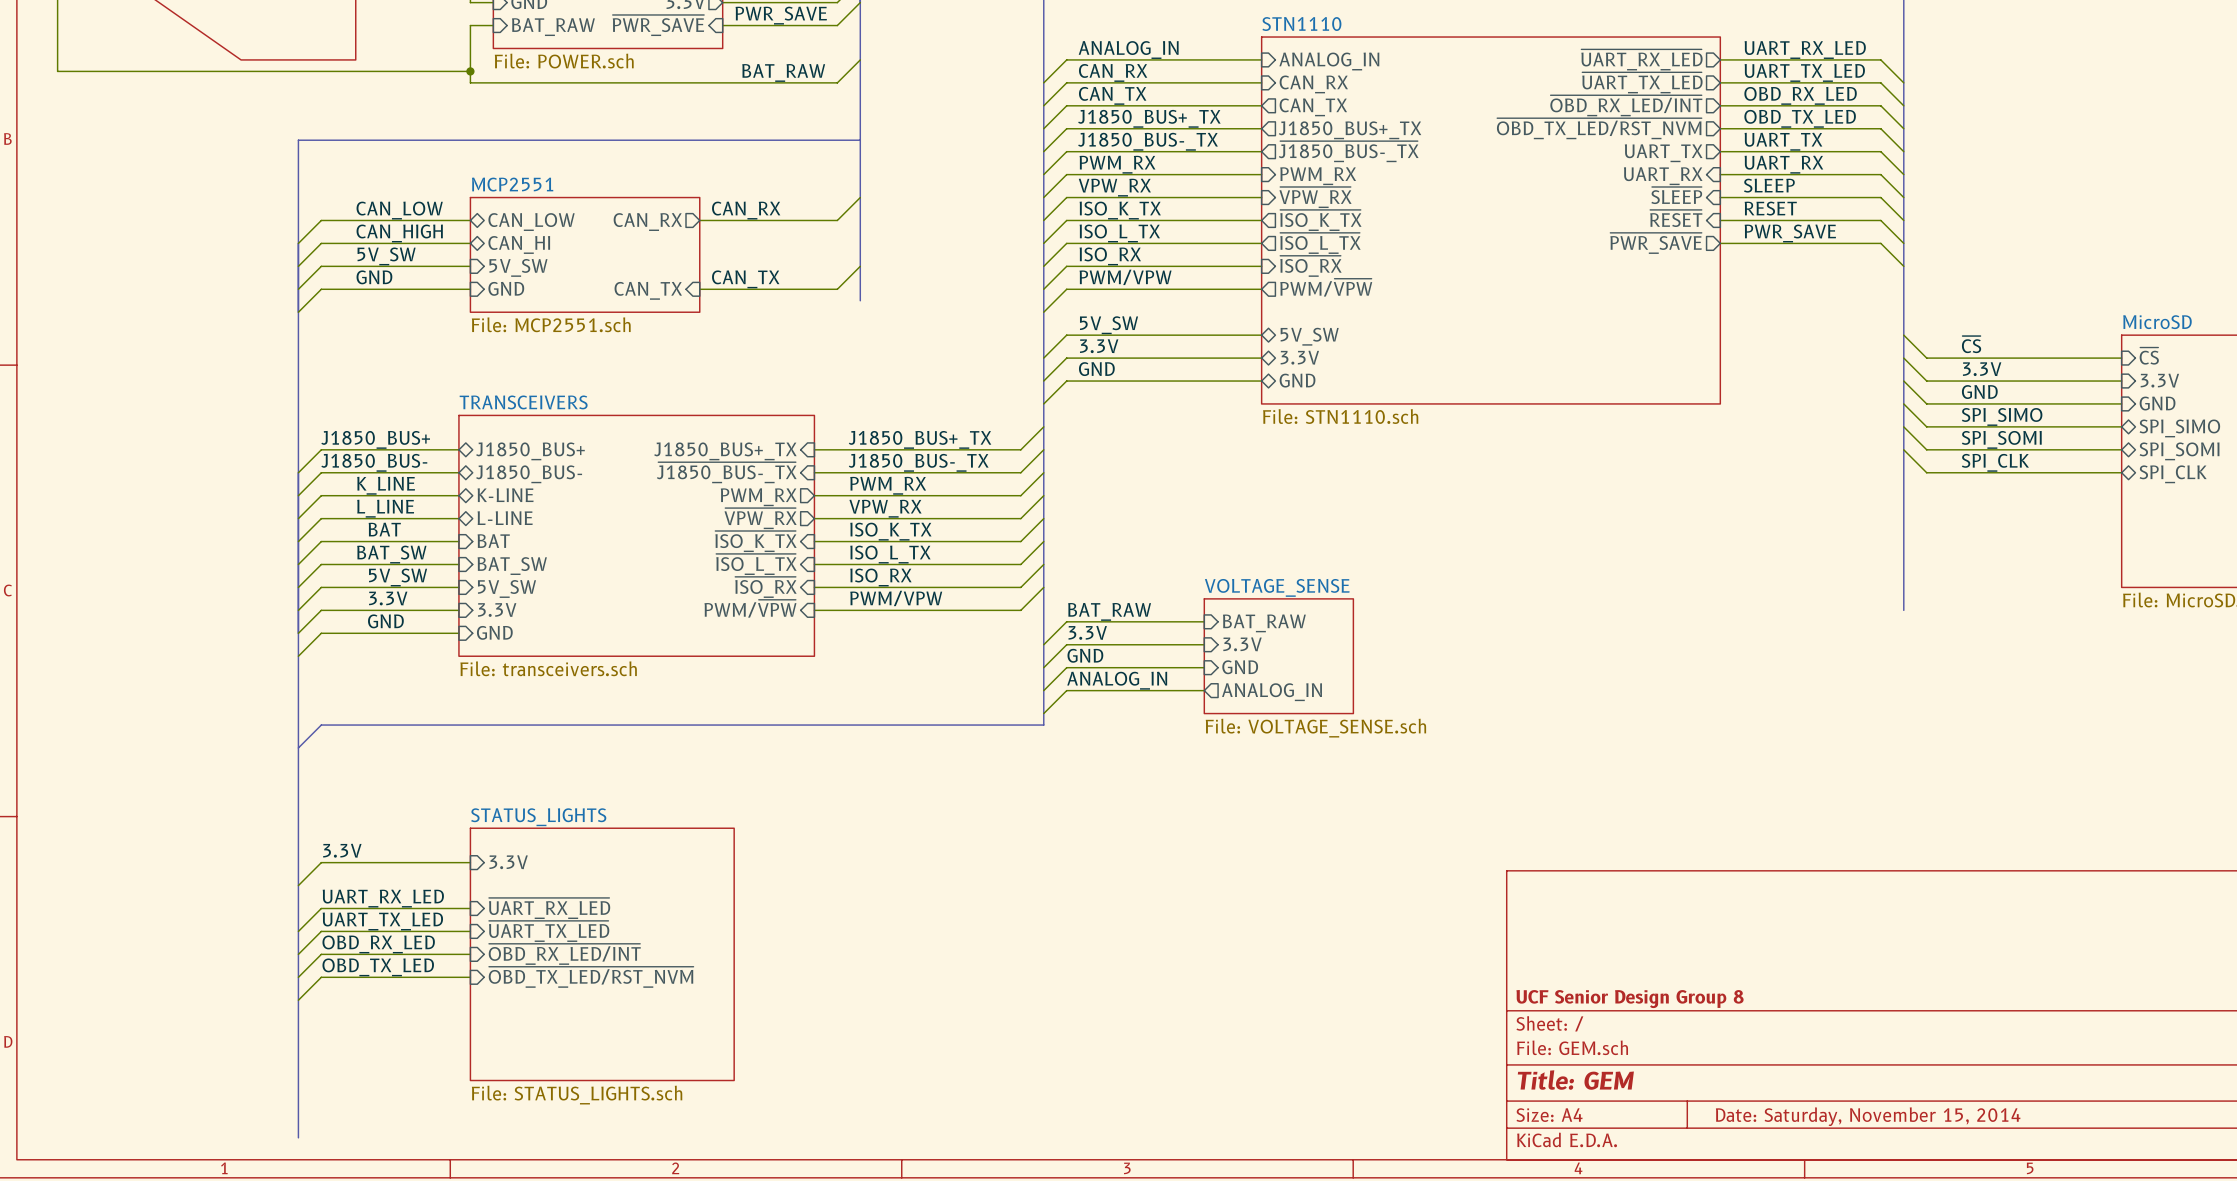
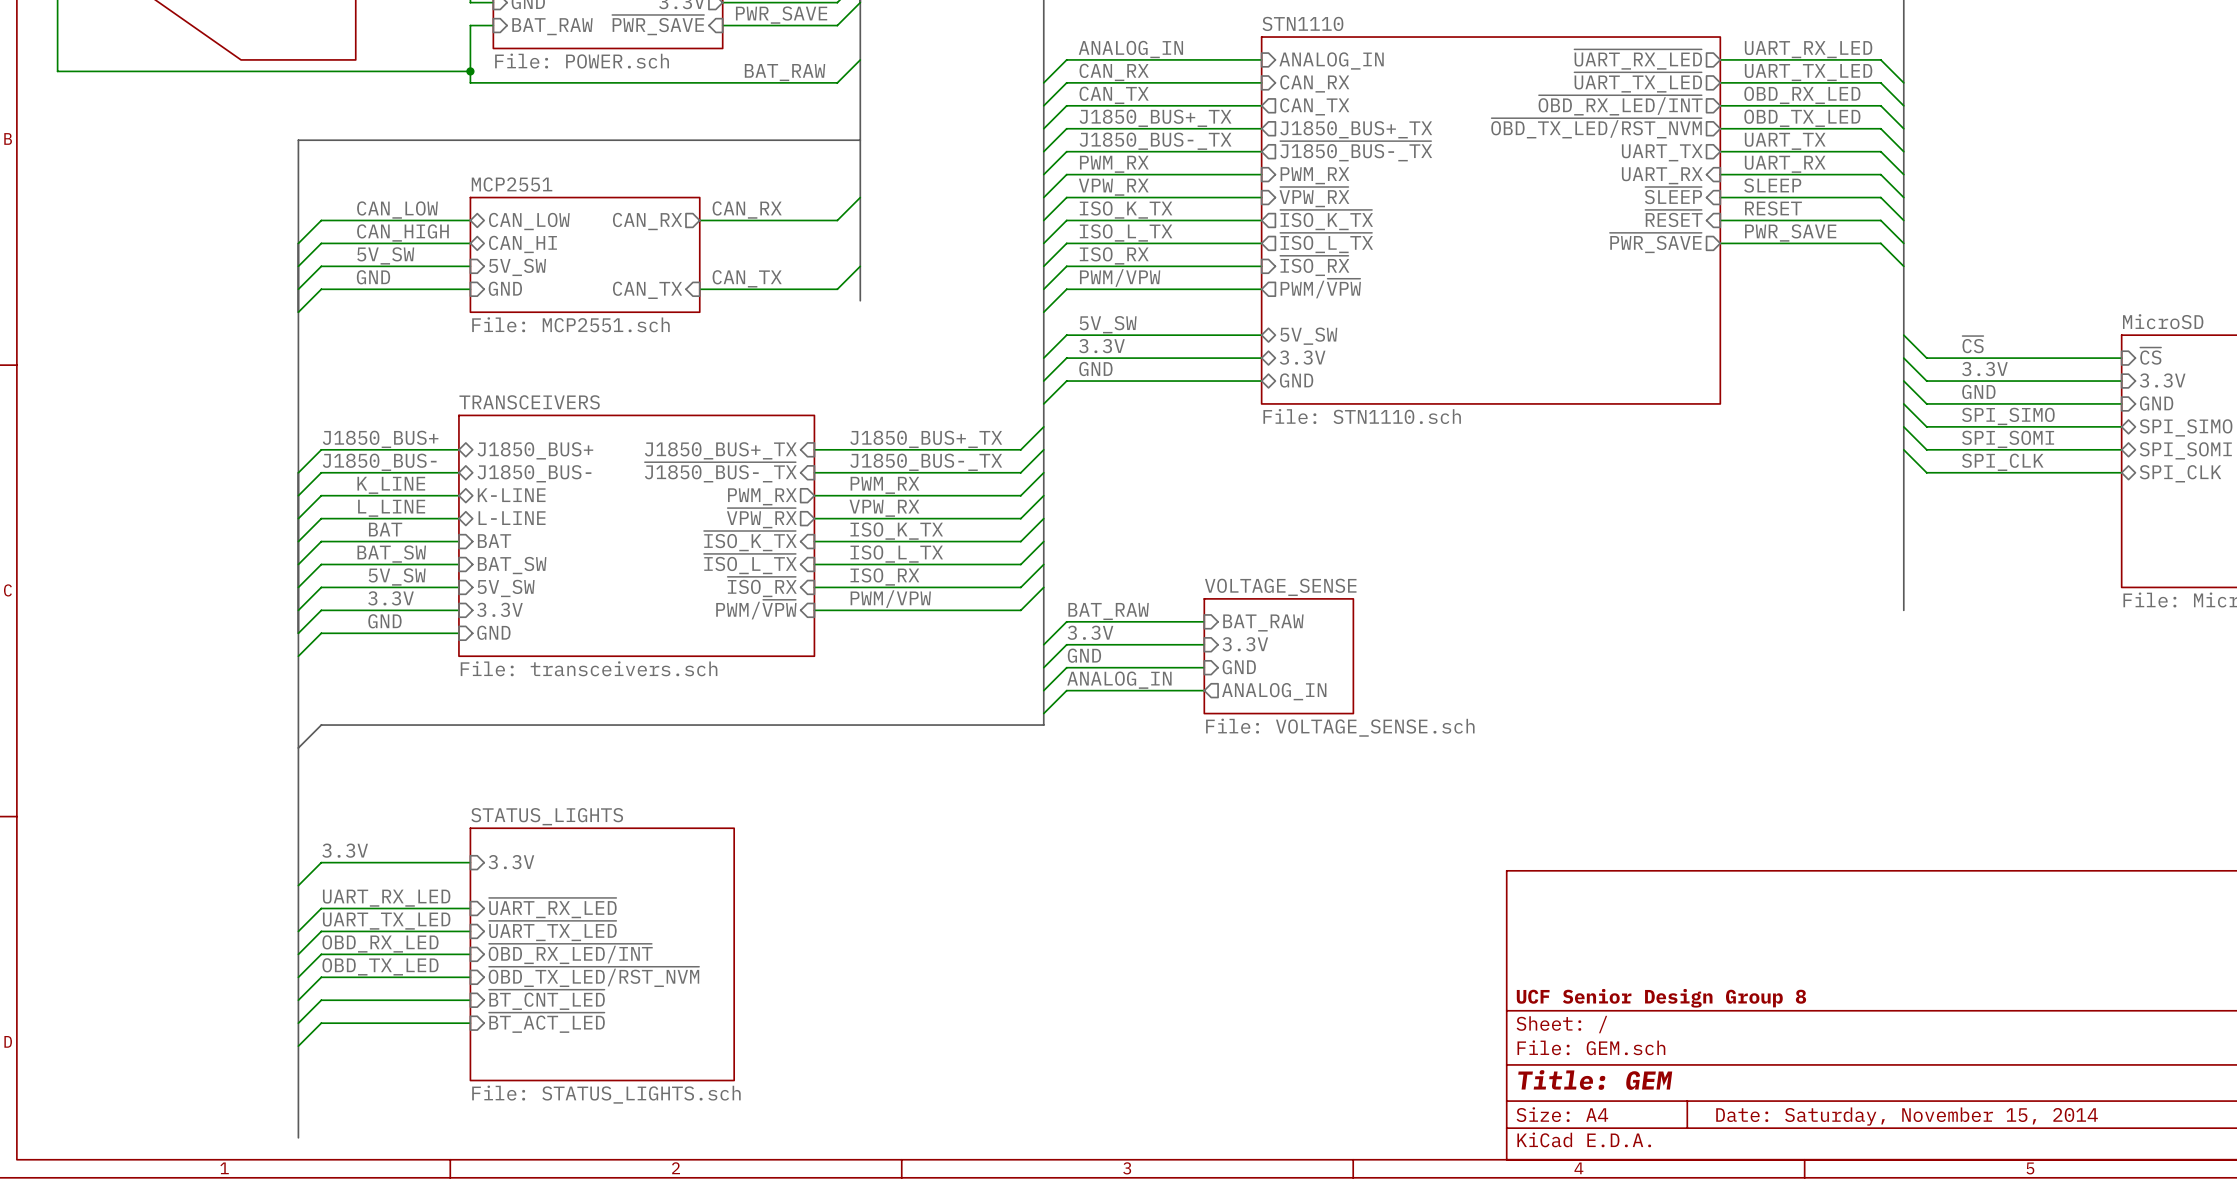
wire: none -> (470, 1000) (321, 1000) (298, 1023)
sheet pin: none -> ~{BT_CNT_LED} (546, 999)
wire: none -> (470, 1023) (321, 1023) (298, 1046)
sheet pin: none -> ~{BT_ACT_LED} (546, 1022)

